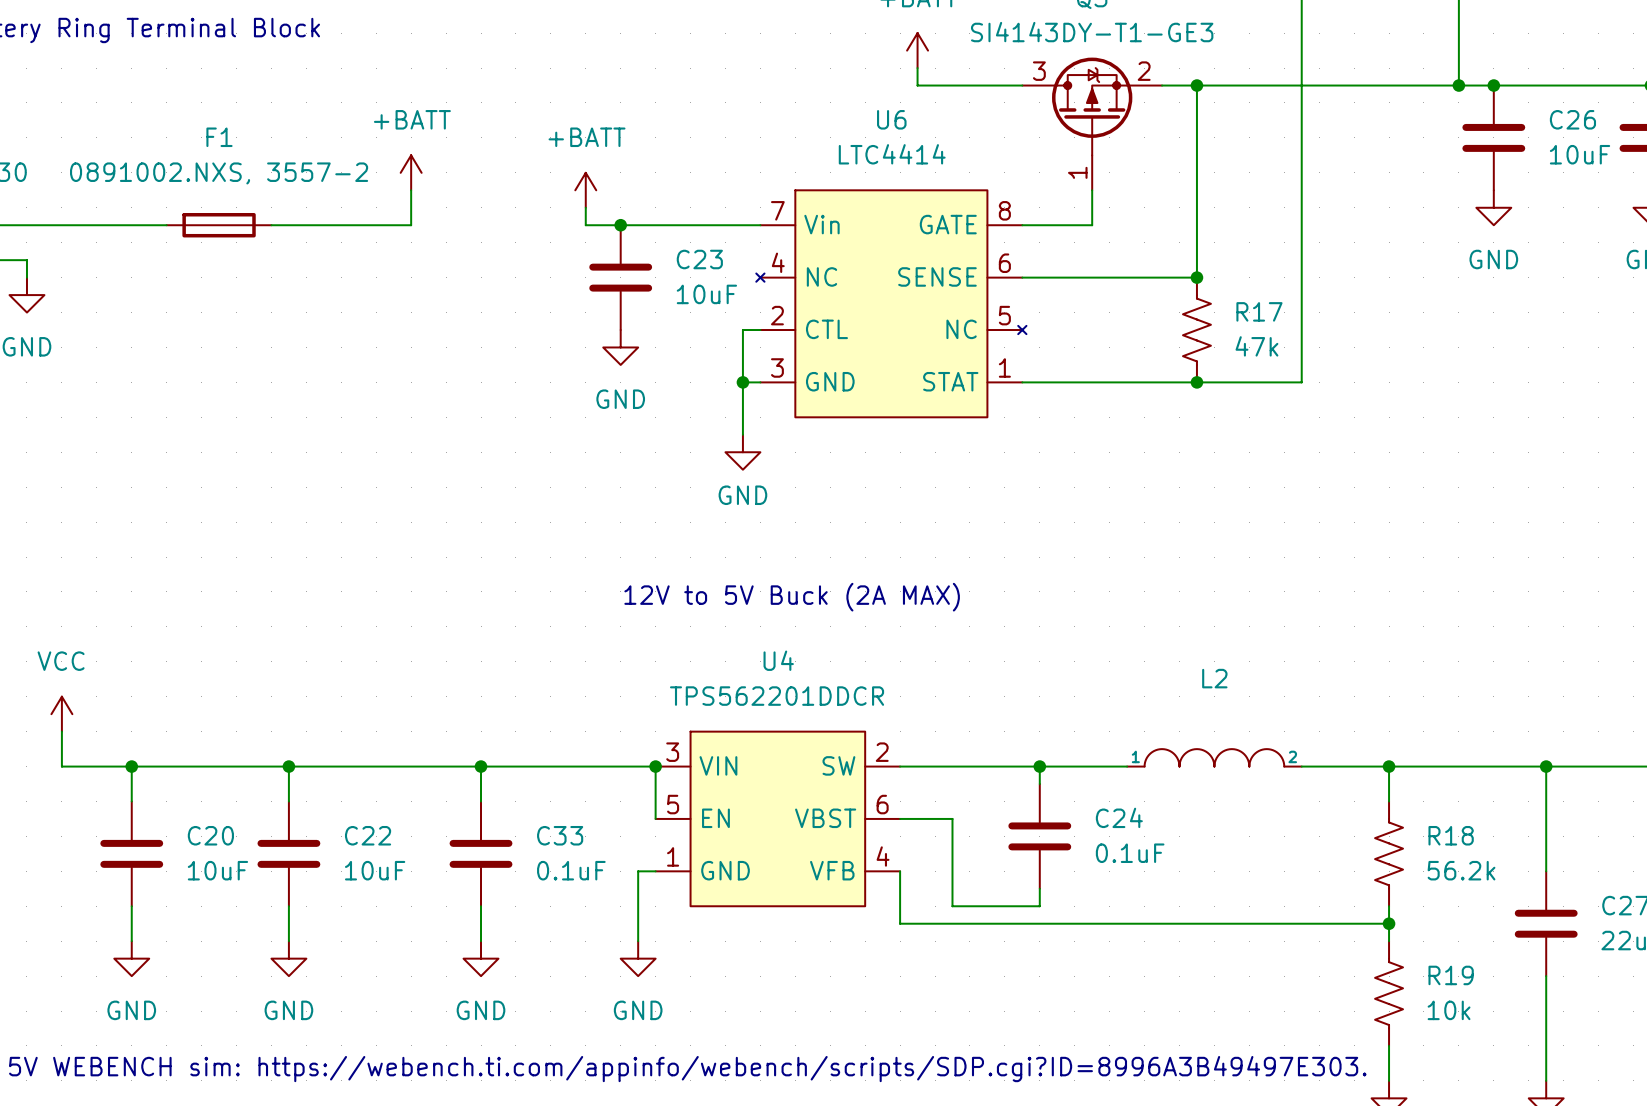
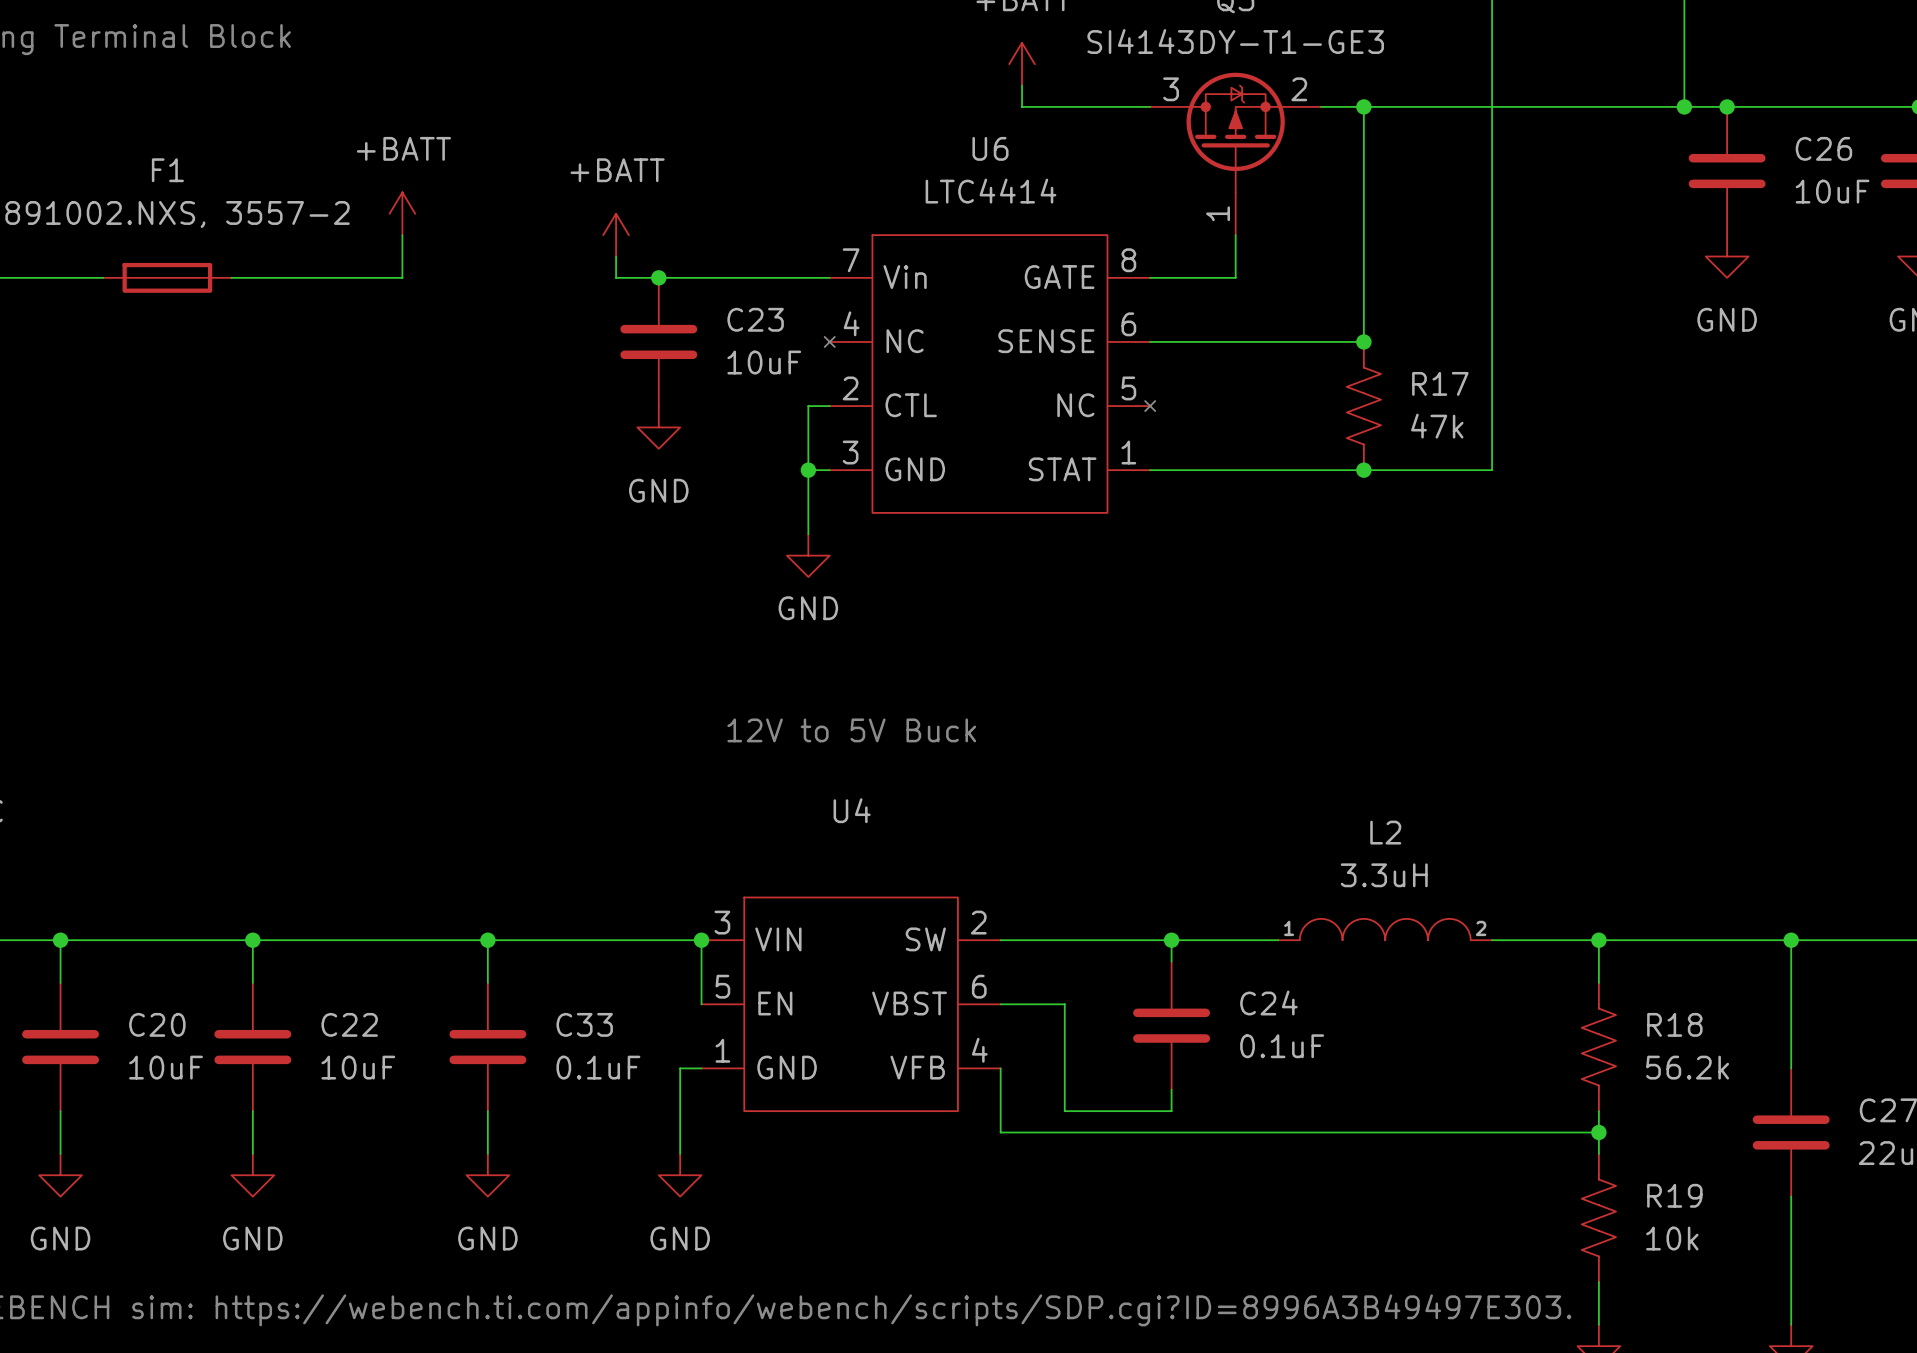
text: 12V to 5V Buck (2A MAX) (792, 597) -> 12V to 5V Buck (851, 730)
U4 value: TPS562201DDCR (777, 696) -> none
L2 value: none -> 3.3uH (1384, 875)

